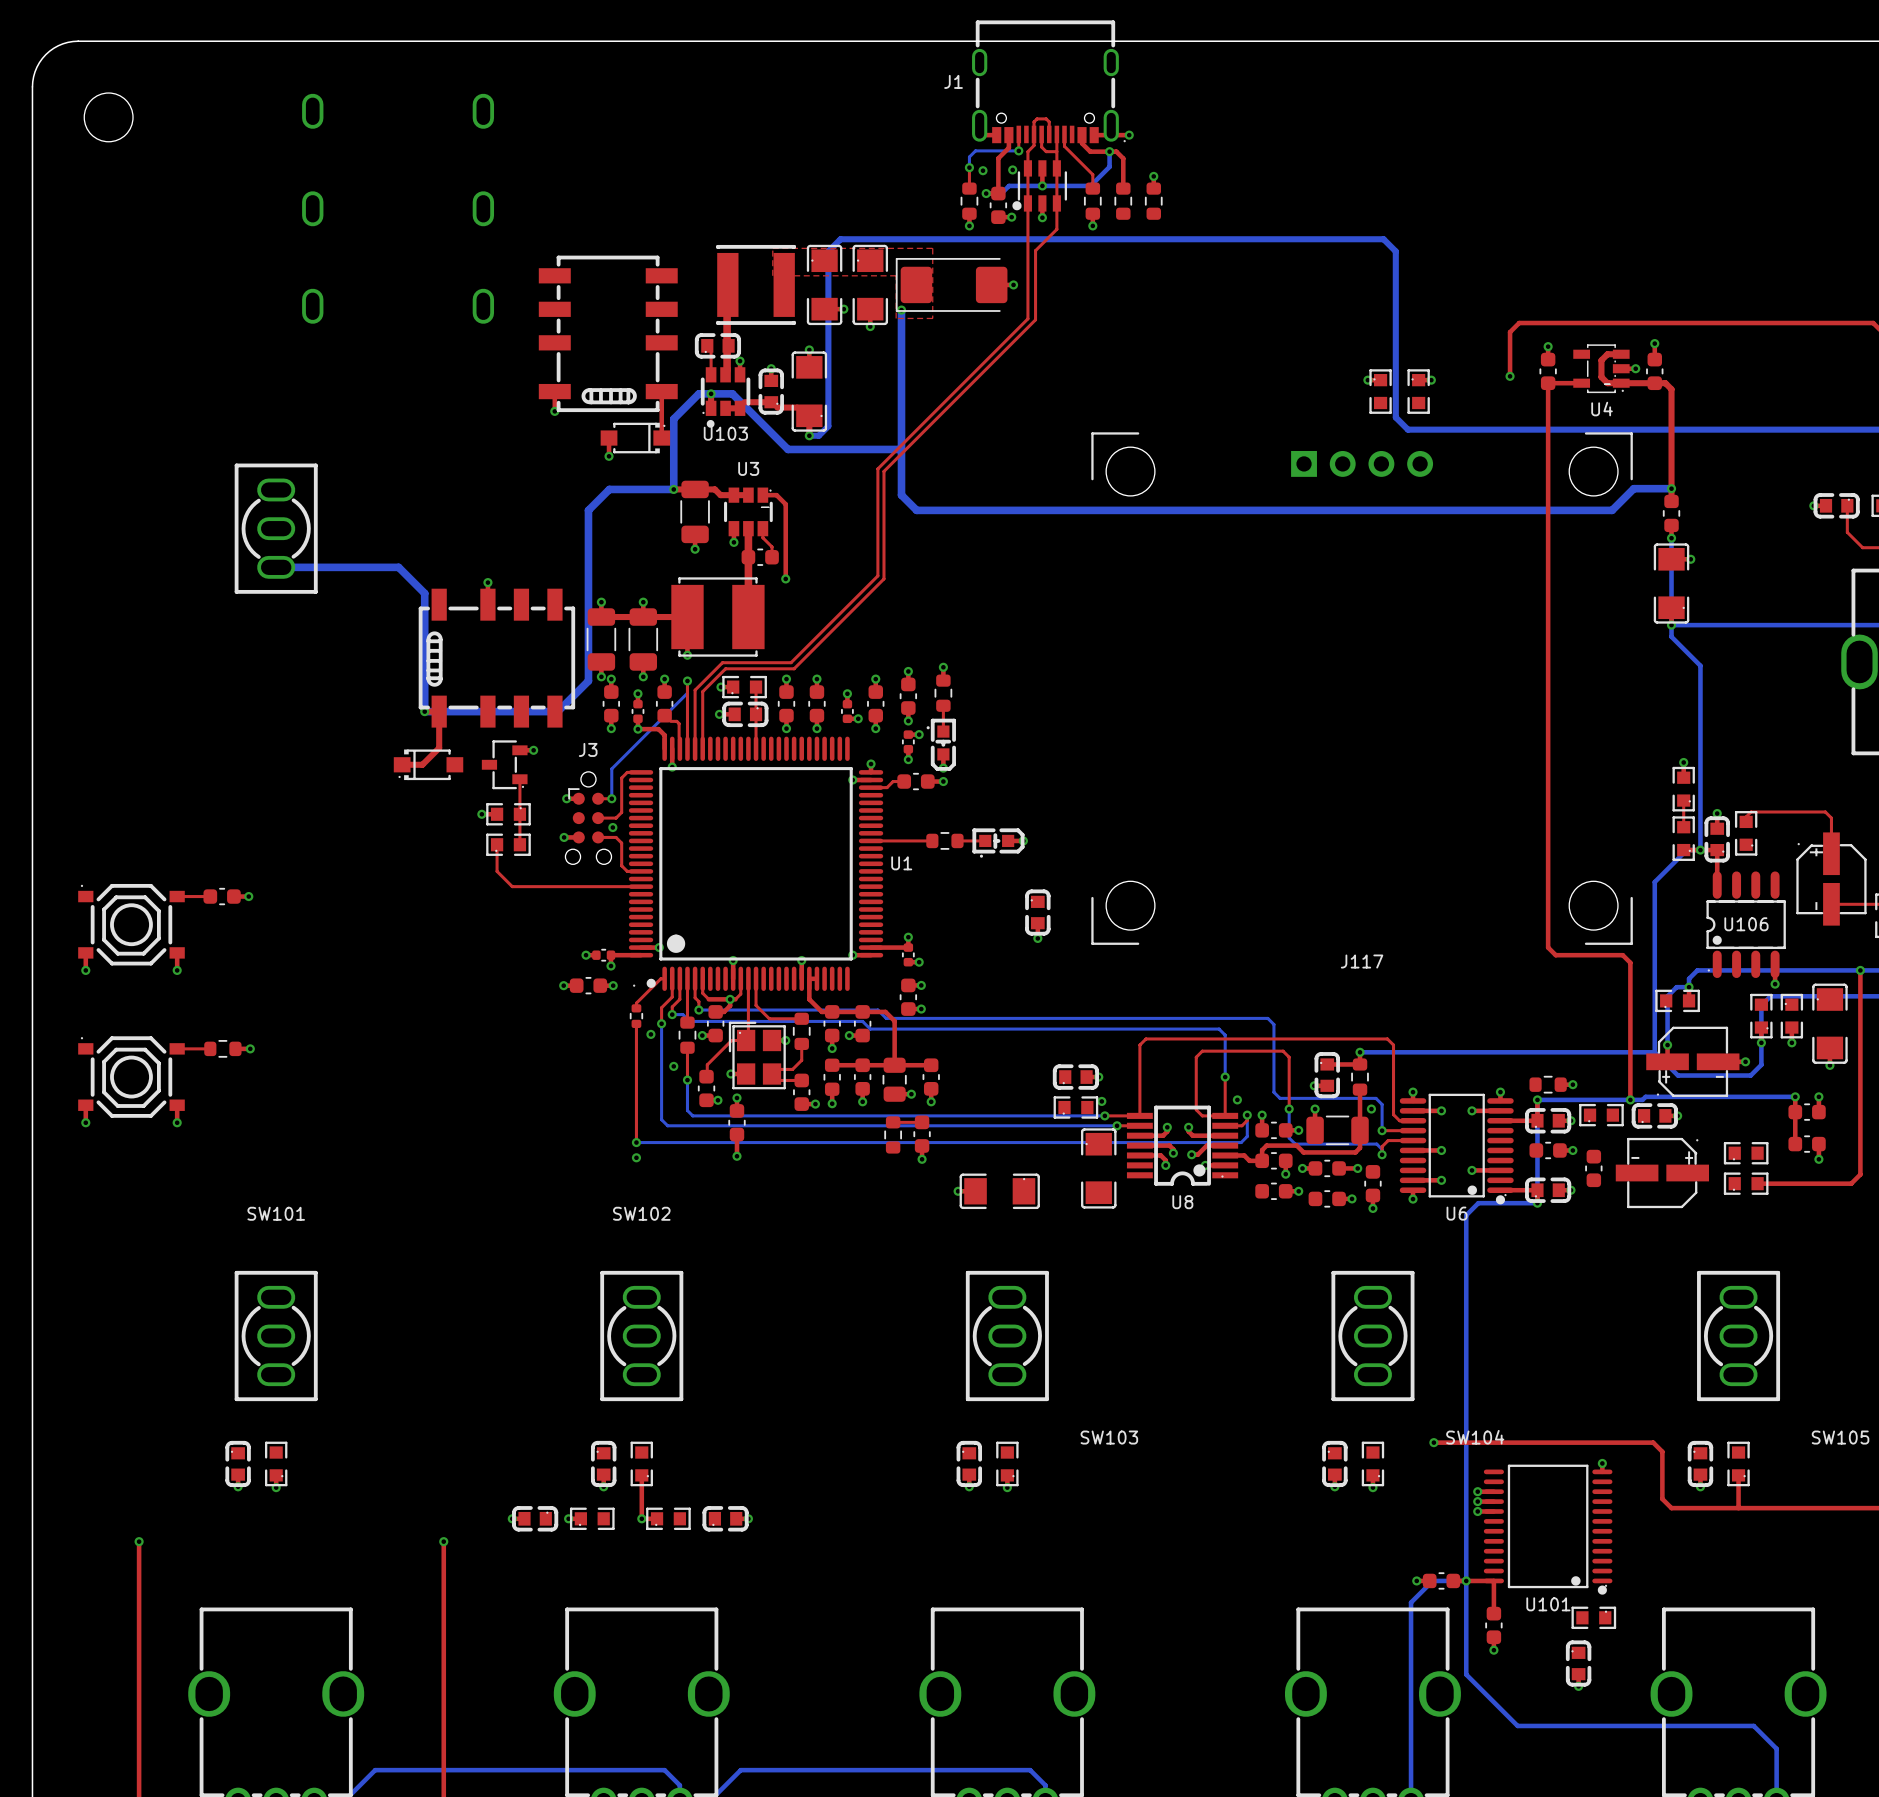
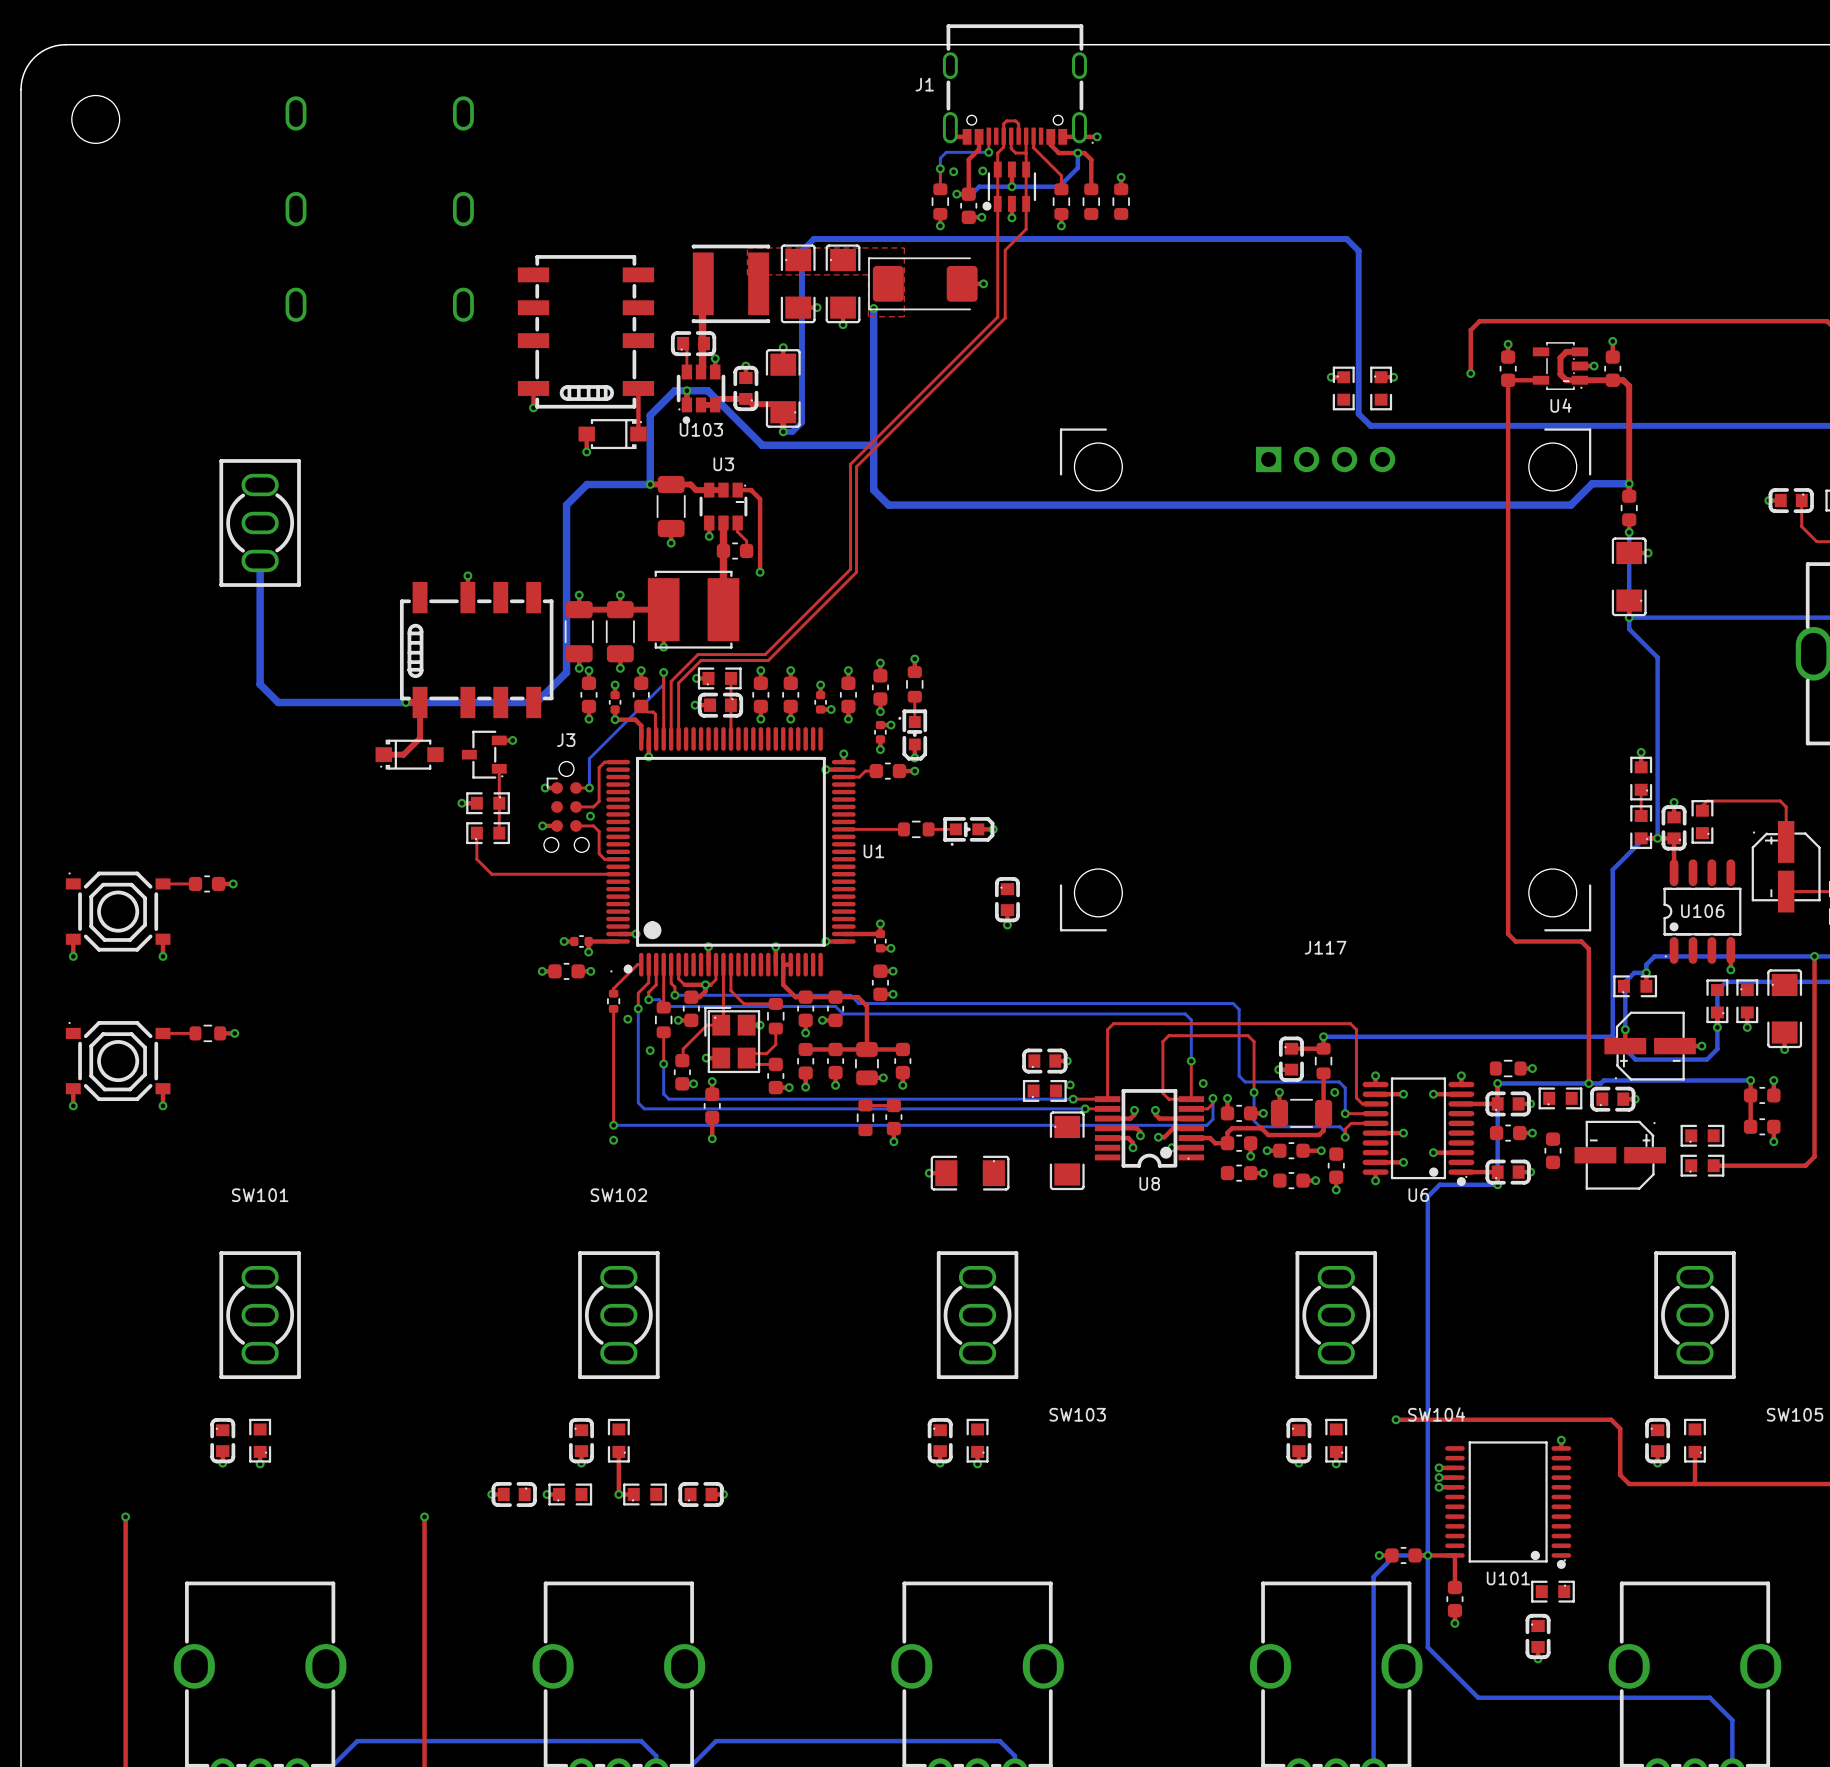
bottom track: (276, 567) (398, 567) (424, 593) (424, 711) -> (260, 560) (260, 684) (278, 702) (405, 702)

